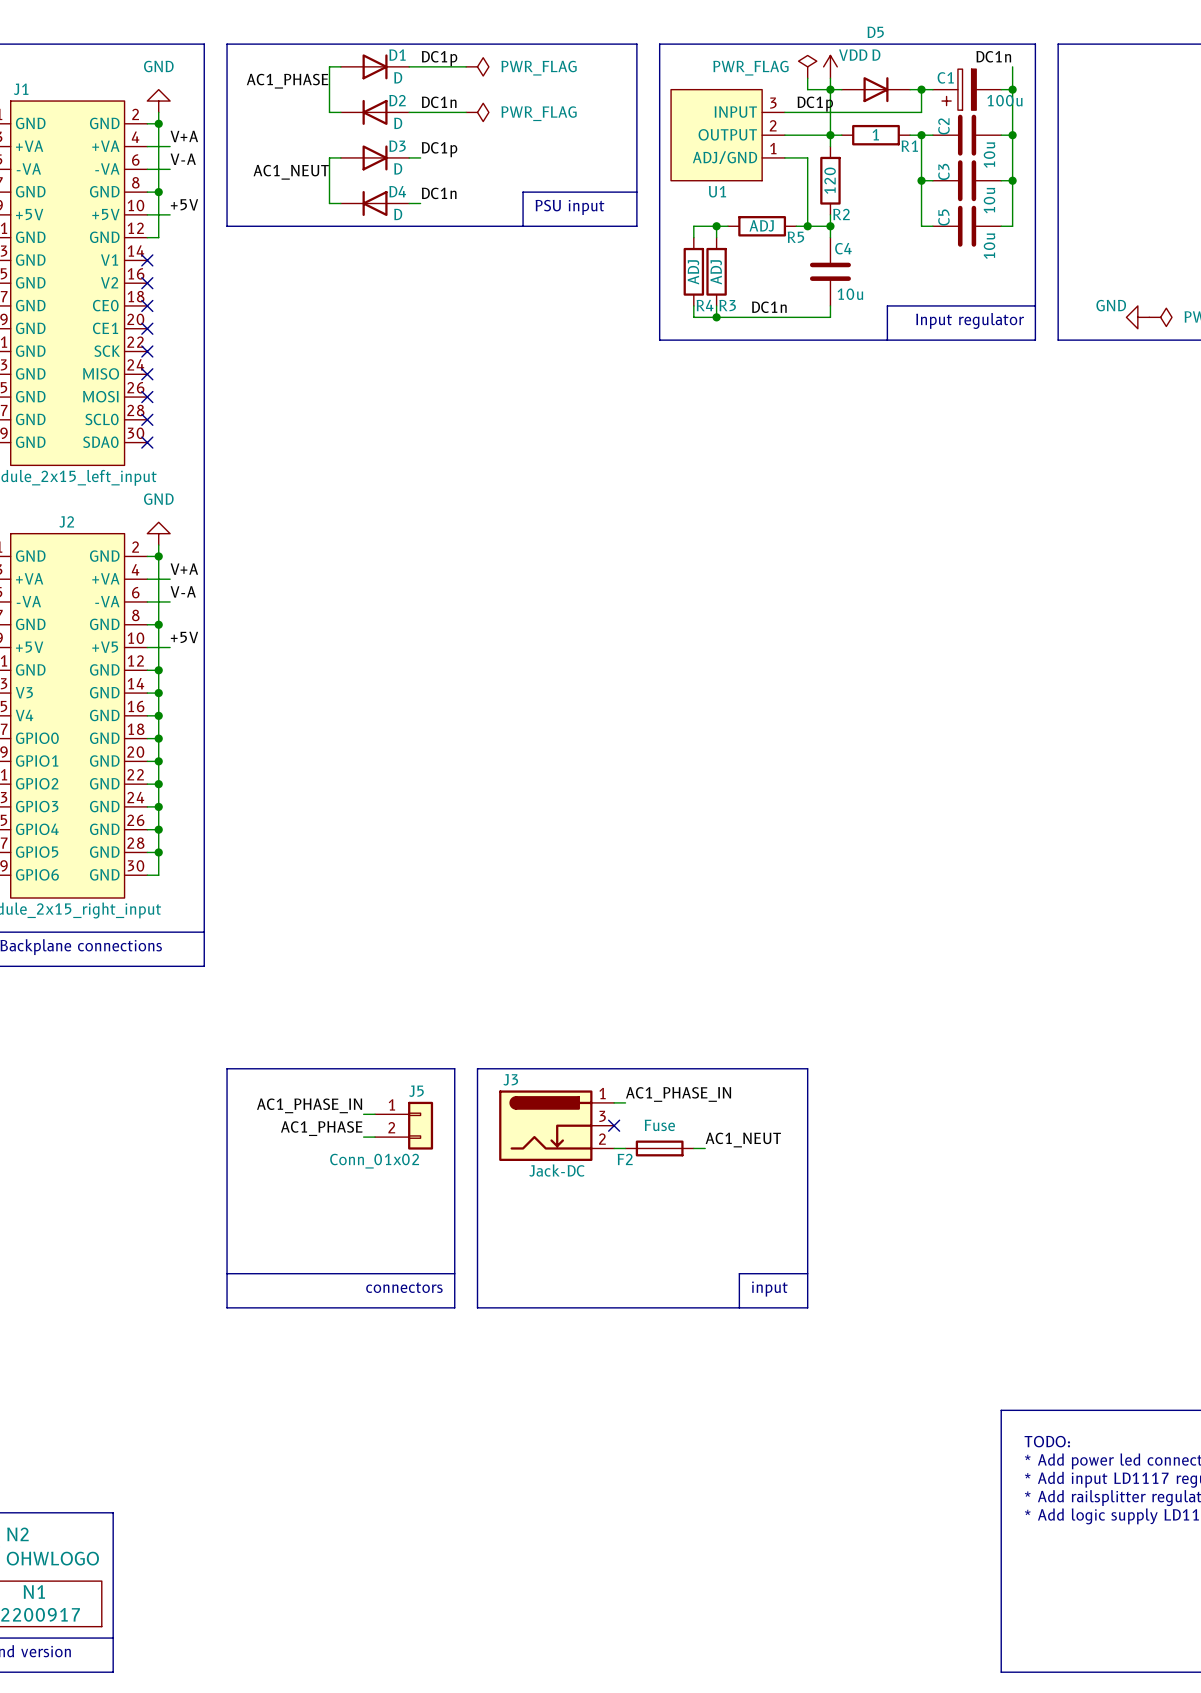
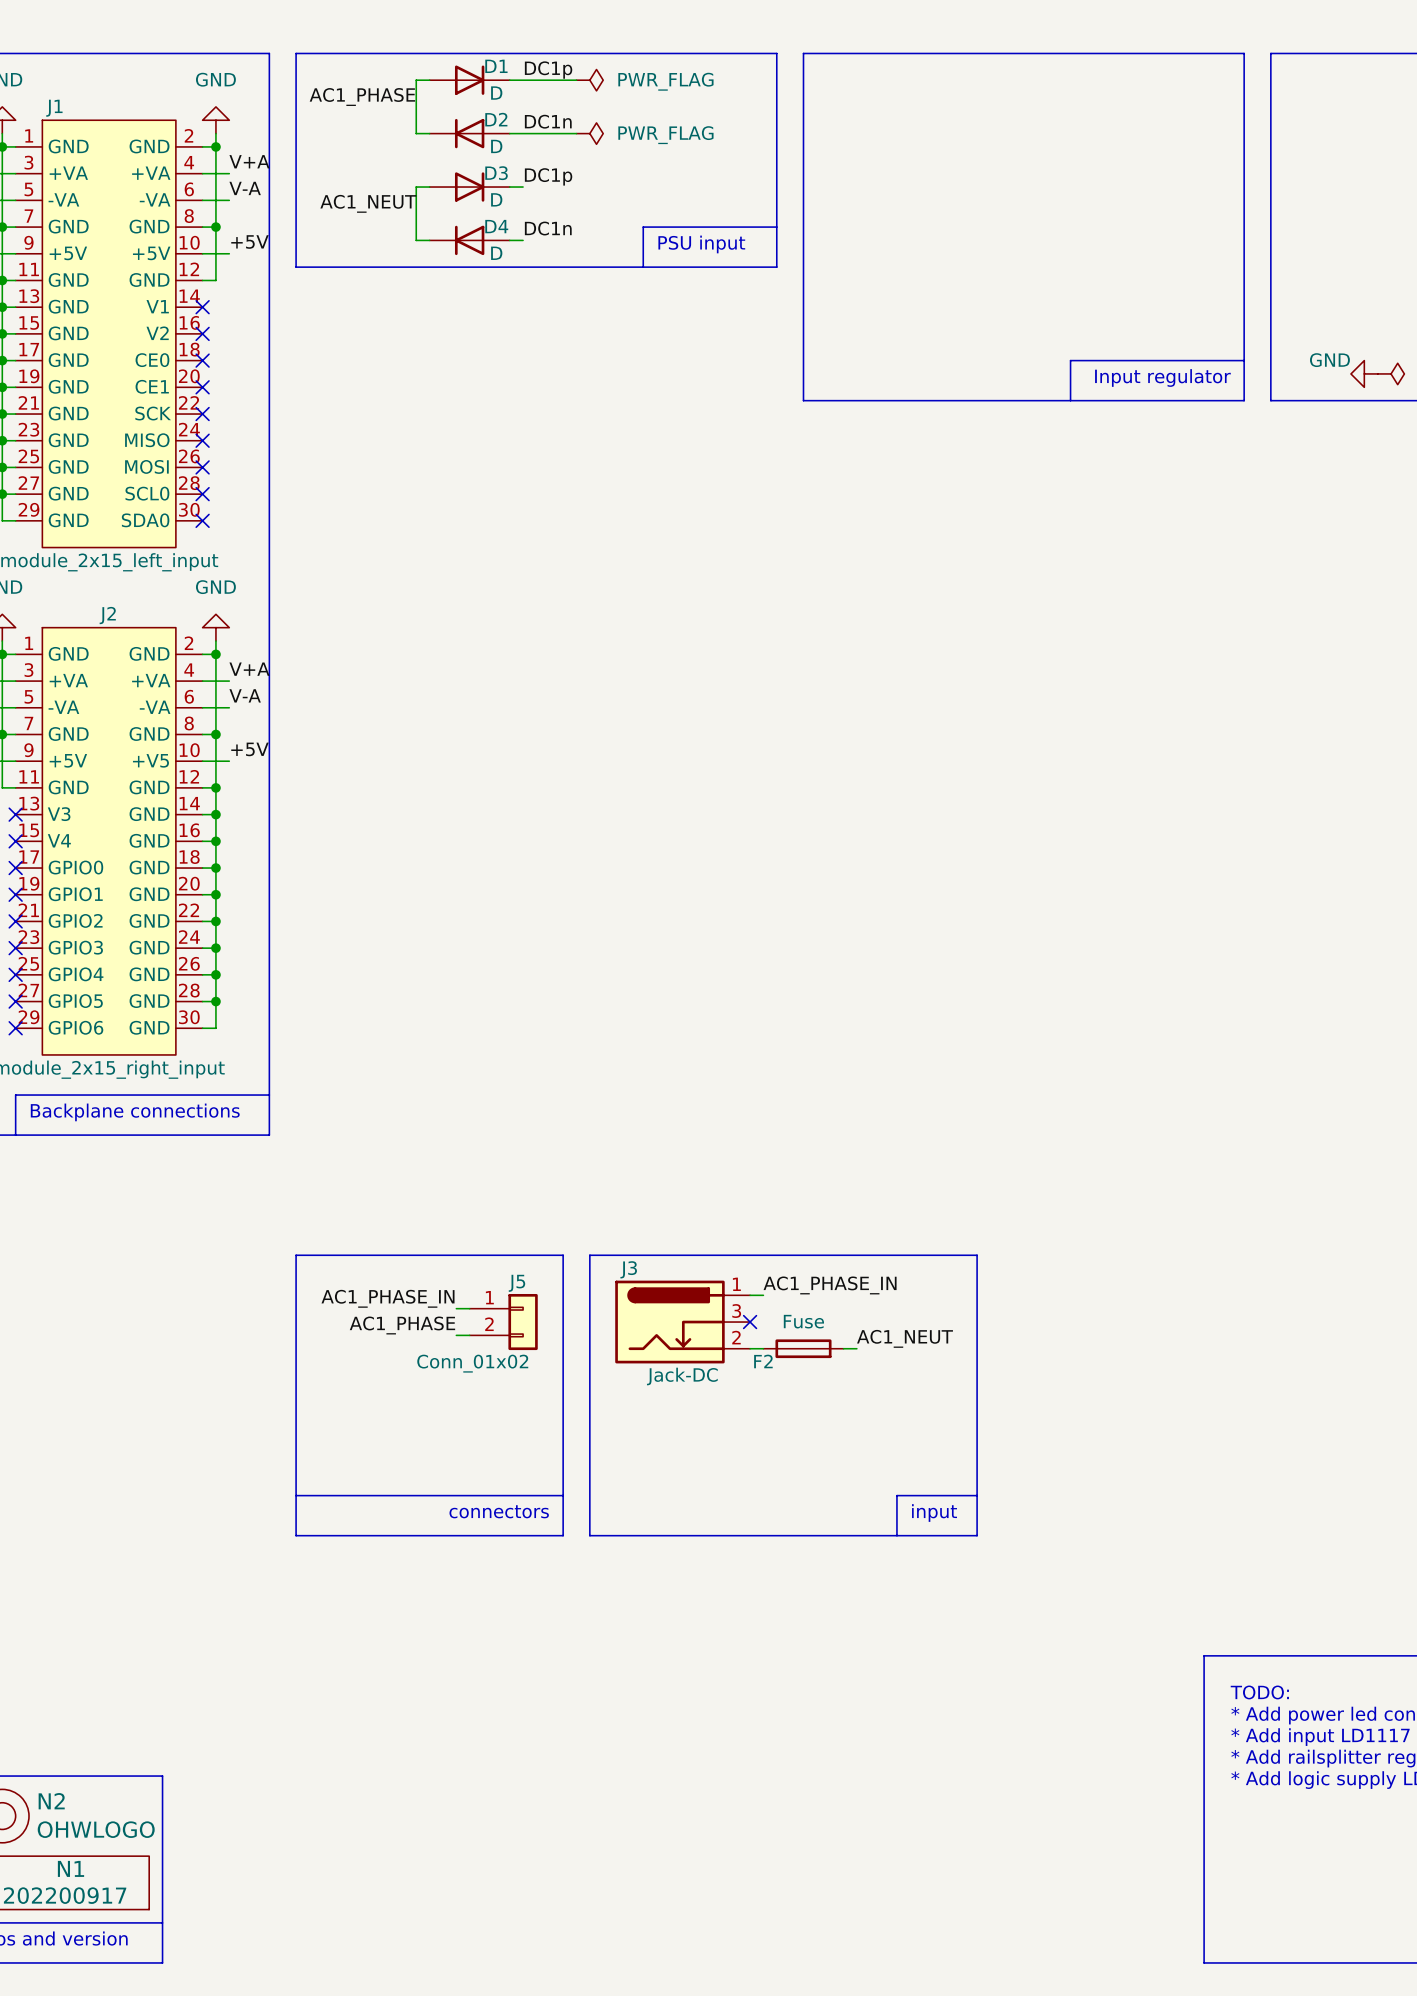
label: DC1n (993, 56) -> none
power symbol: PWR_FLAG (807, 66) -> none
power symbol: VDD (830, 66) -> none
wire: (1012, 66) (1012, 226) (1001, 226) -> none
wire: (807, 78) (807, 89) (841, 89) -> none
wire: (830, 78) (830, 146) -> none
junction: (830, 89) -> none
D5: D (875, 89) -> none
wire: (910, 89) (932, 89) -> none
wire: (921, 89) (921, 112) (784, 112) -> none
junction: (921, 89) -> none
C1: 100u (967, 89) -> none
wire: (1001, 89) (1012, 89) -> none
junction: (1012, 89) -> none
label: DC1p (815, 104) -> none
U1: (727, 135) -> none
wire: (784, 135) (841, 135) -> none
junction: (830, 135) -> none
R1: 1 (875, 135) -> none
wire: (910, 135) (932, 135) -> none
wire: (921, 135) (921, 226) (932, 226) -> none
junction: (921, 135) -> none
C2: 10u (967, 135) -> none
wire: (1001, 135) (1012, 135) -> none
junction: (1012, 135) -> none
wire: (784, 157) (807, 157) (807, 226) -> none
R2: 120 (830, 180) -> none
wire: (921, 180) (932, 180) -> none
junction: (921, 180) -> none
C3: 10u (967, 180) -> none
wire: (1001, 180) (1012, 180) -> none
junction: (1012, 180) -> none
wire: (830, 214) (830, 237) -> none
wire: (716, 226) (716, 237) -> none
junction: (716, 226) -> none
wire: (727, 226) (693, 226) (693, 237) -> none
R5: ADJ (762, 226) -> none
wire: (796, 226) (830, 226) -> none
junction: (807, 226) -> none
junction: (830, 226) -> none
C5: 10u (967, 226) -> none
R4: ADJ (693, 271) -> none
R3: ADJ (716, 271) -> none
C4: 10u (830, 271) -> none
wire: (693, 305) (693, 317) (830, 317) (830, 305) -> none
wire: (716, 305) (716, 317) -> none
label: DC1n (769, 307) -> none
junction: (716, 317) -> none

